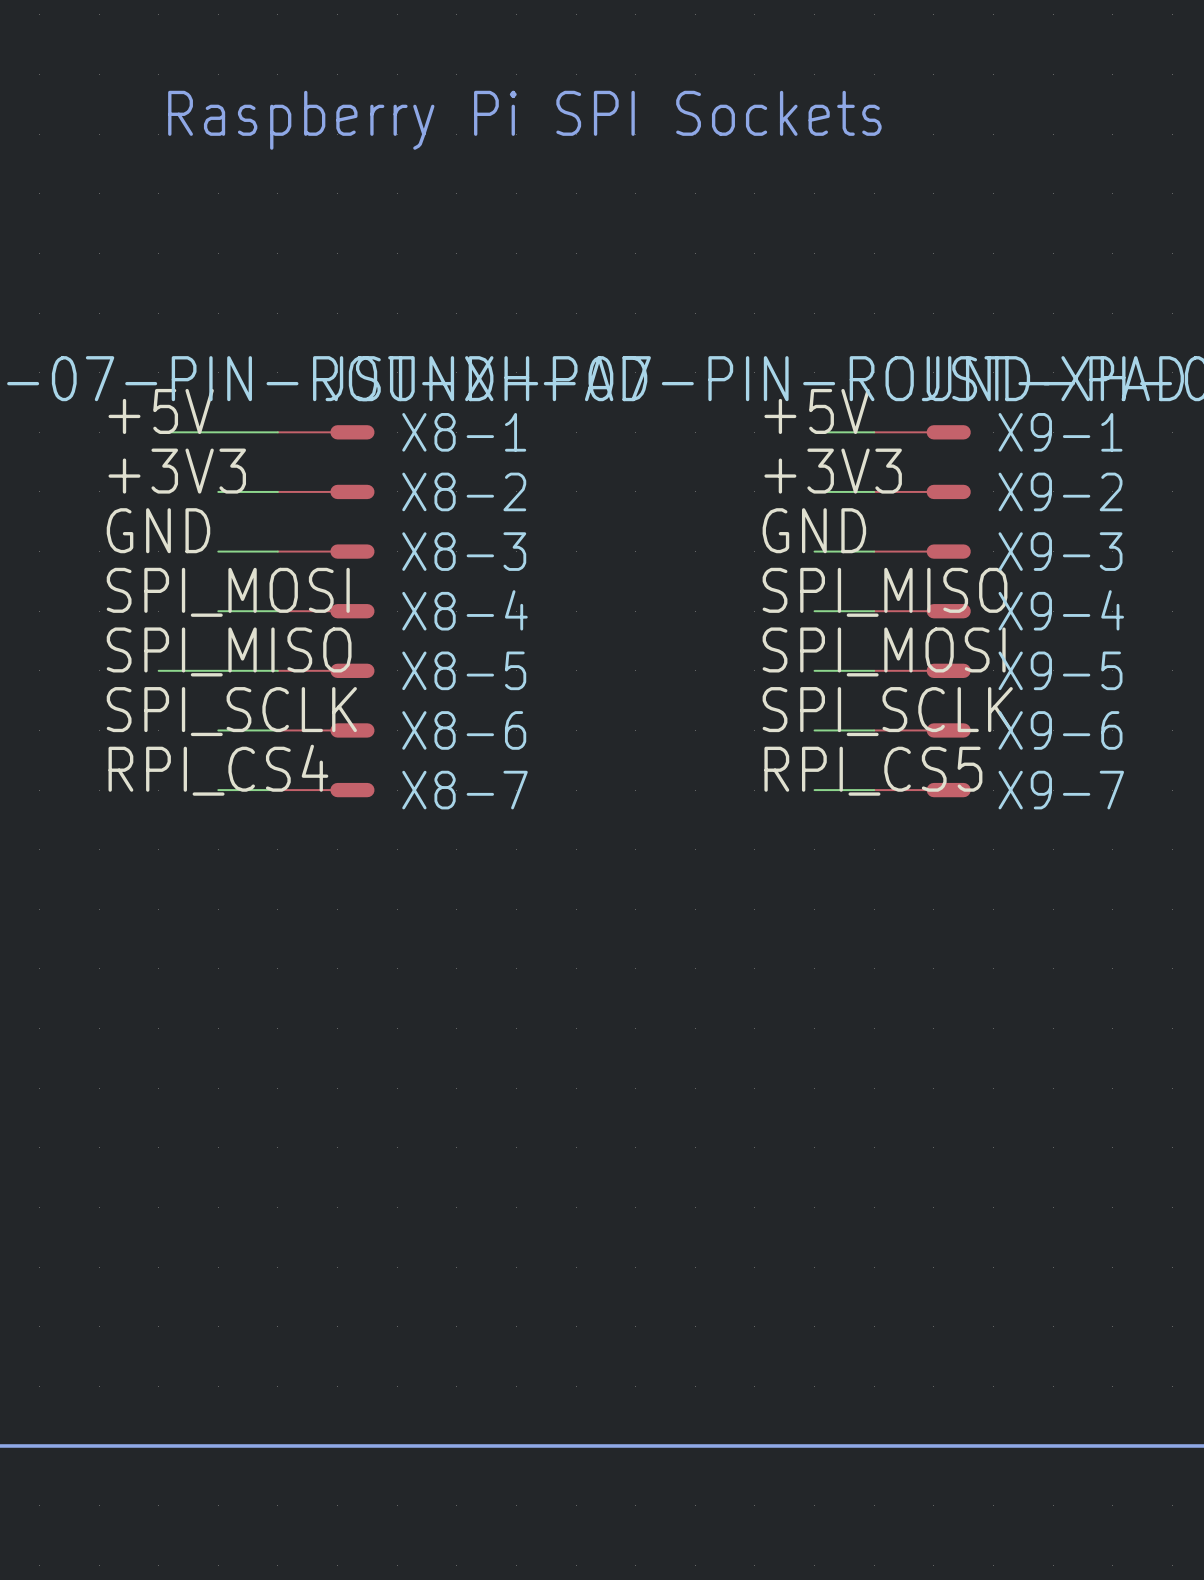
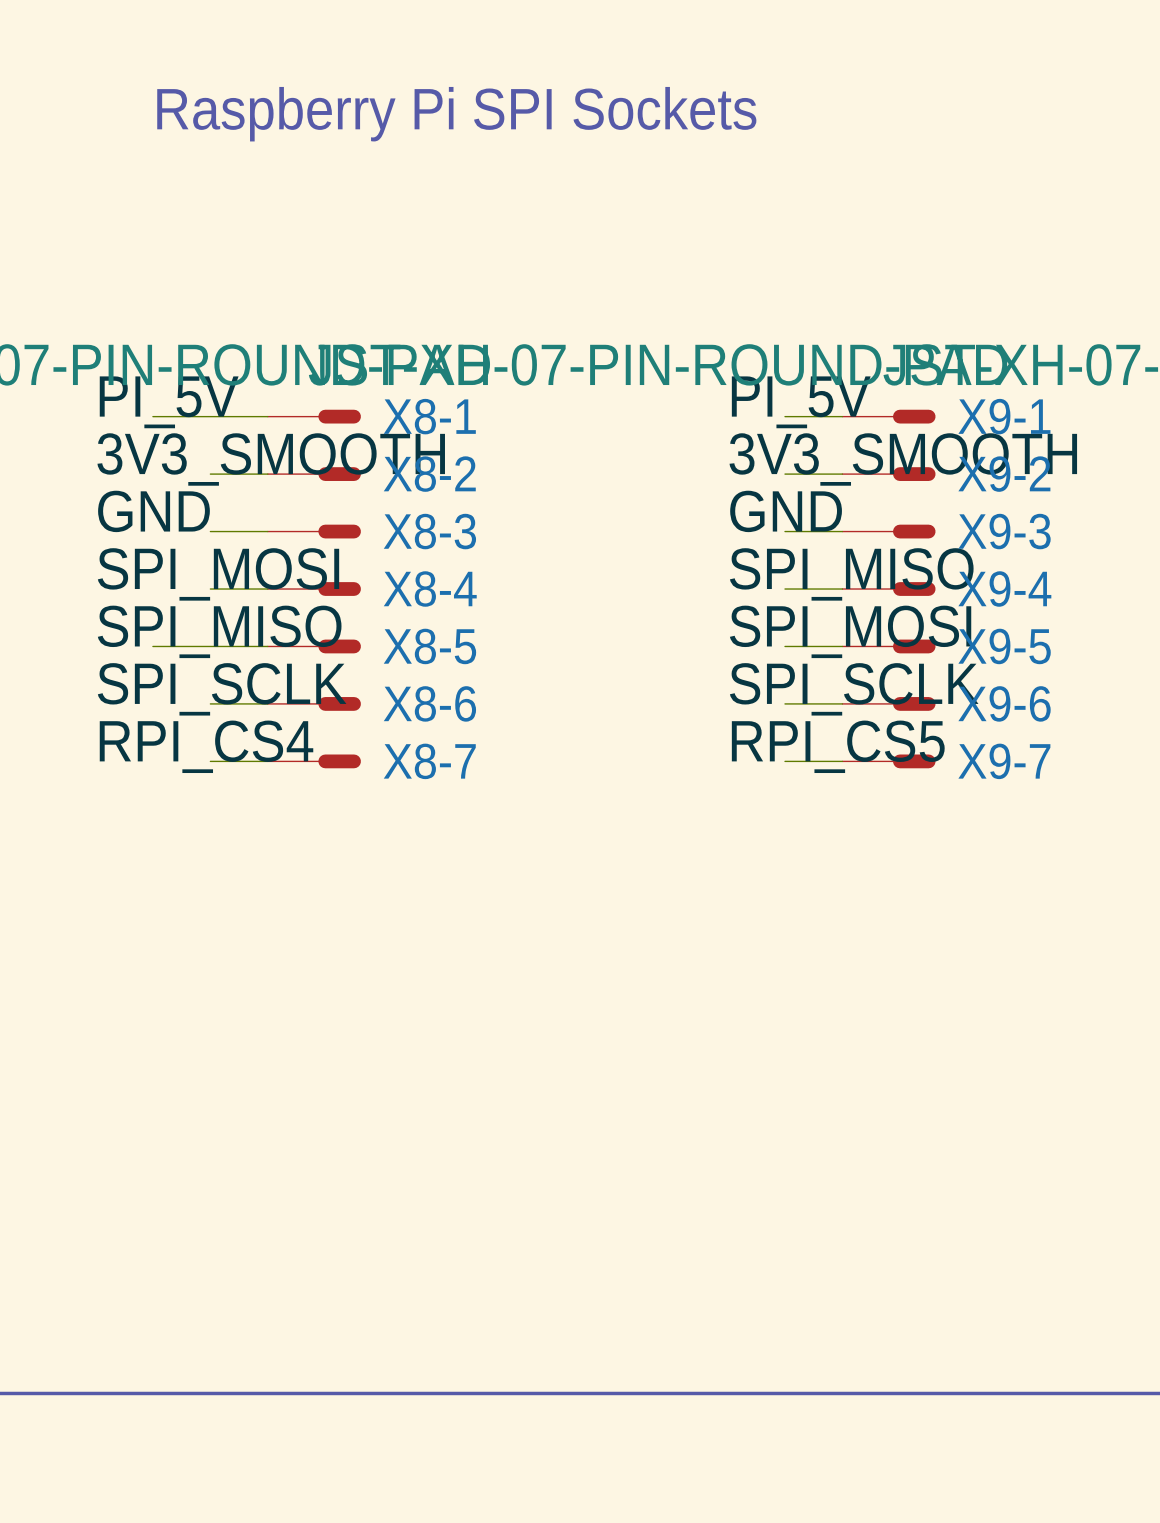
label: +5V (161, 411) -> PI_5V (169, 402)
label: +5V (817, 411) -> PI_5V (801, 402)
label: +3V3 (177, 471) -> 3V3_SMOOTH (271, 459)
label: +3V3 (833, 471) -> 3V3_SMOOTH (903, 459)

